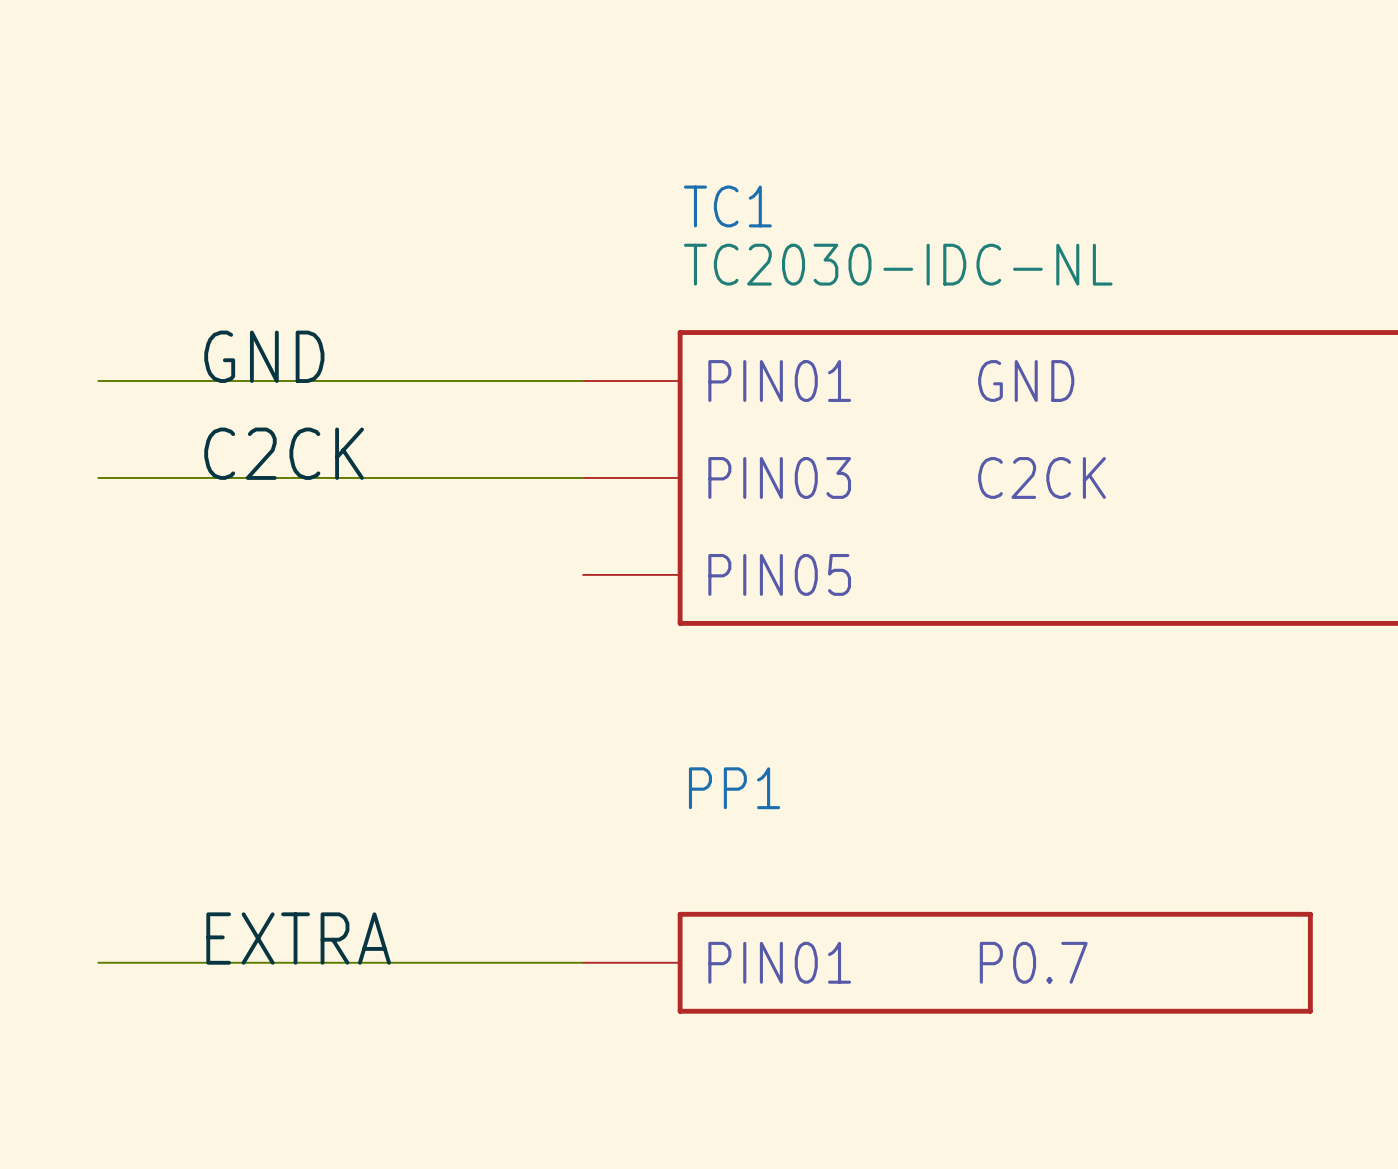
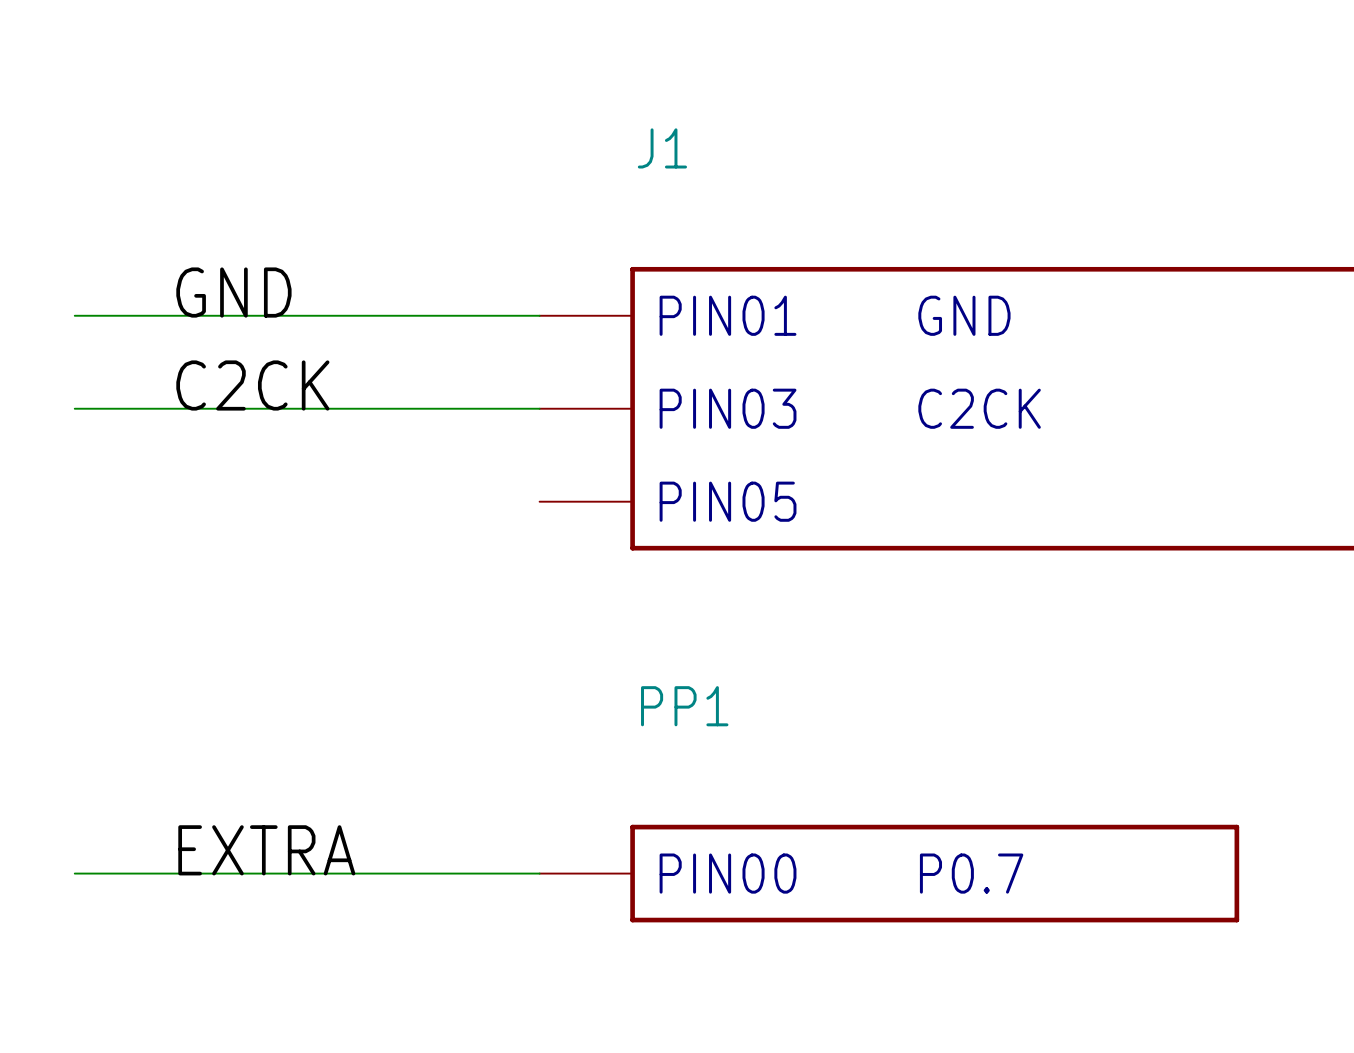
TC1 name: TC1 (727, 206) -> J1 (662, 148)
TC1 value: TC2030-IDC-NL (898, 264) -> none
PP1 text: PIN01 (779, 962) -> PIN00 (728, 873)

